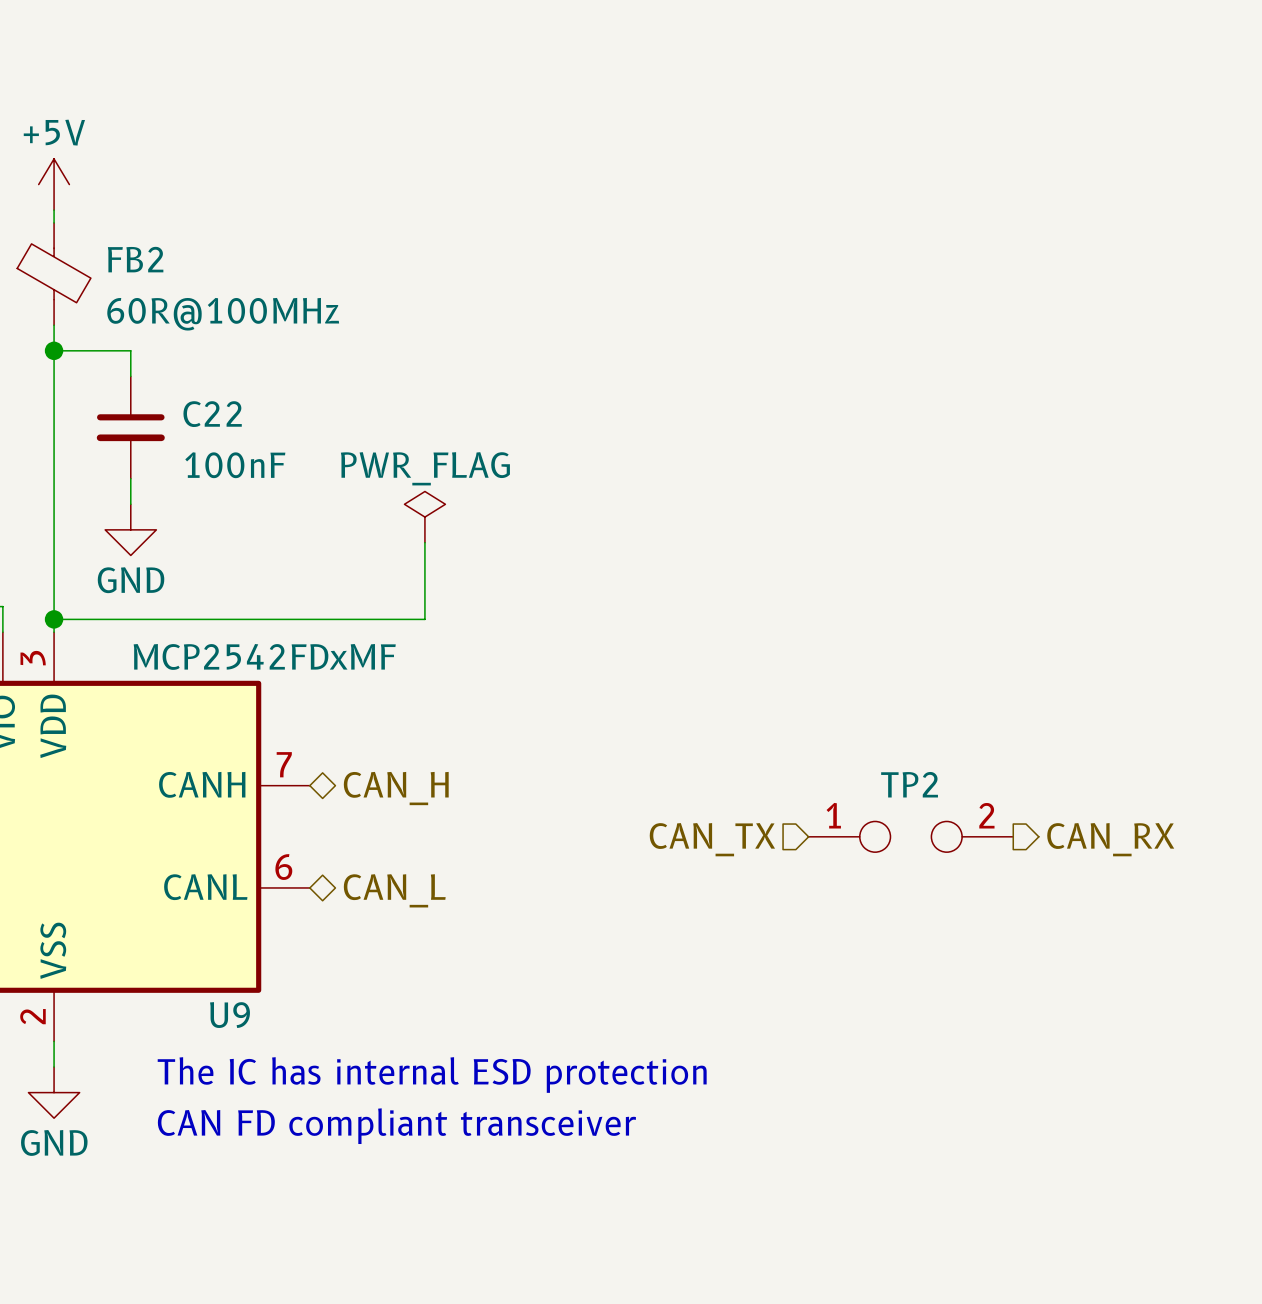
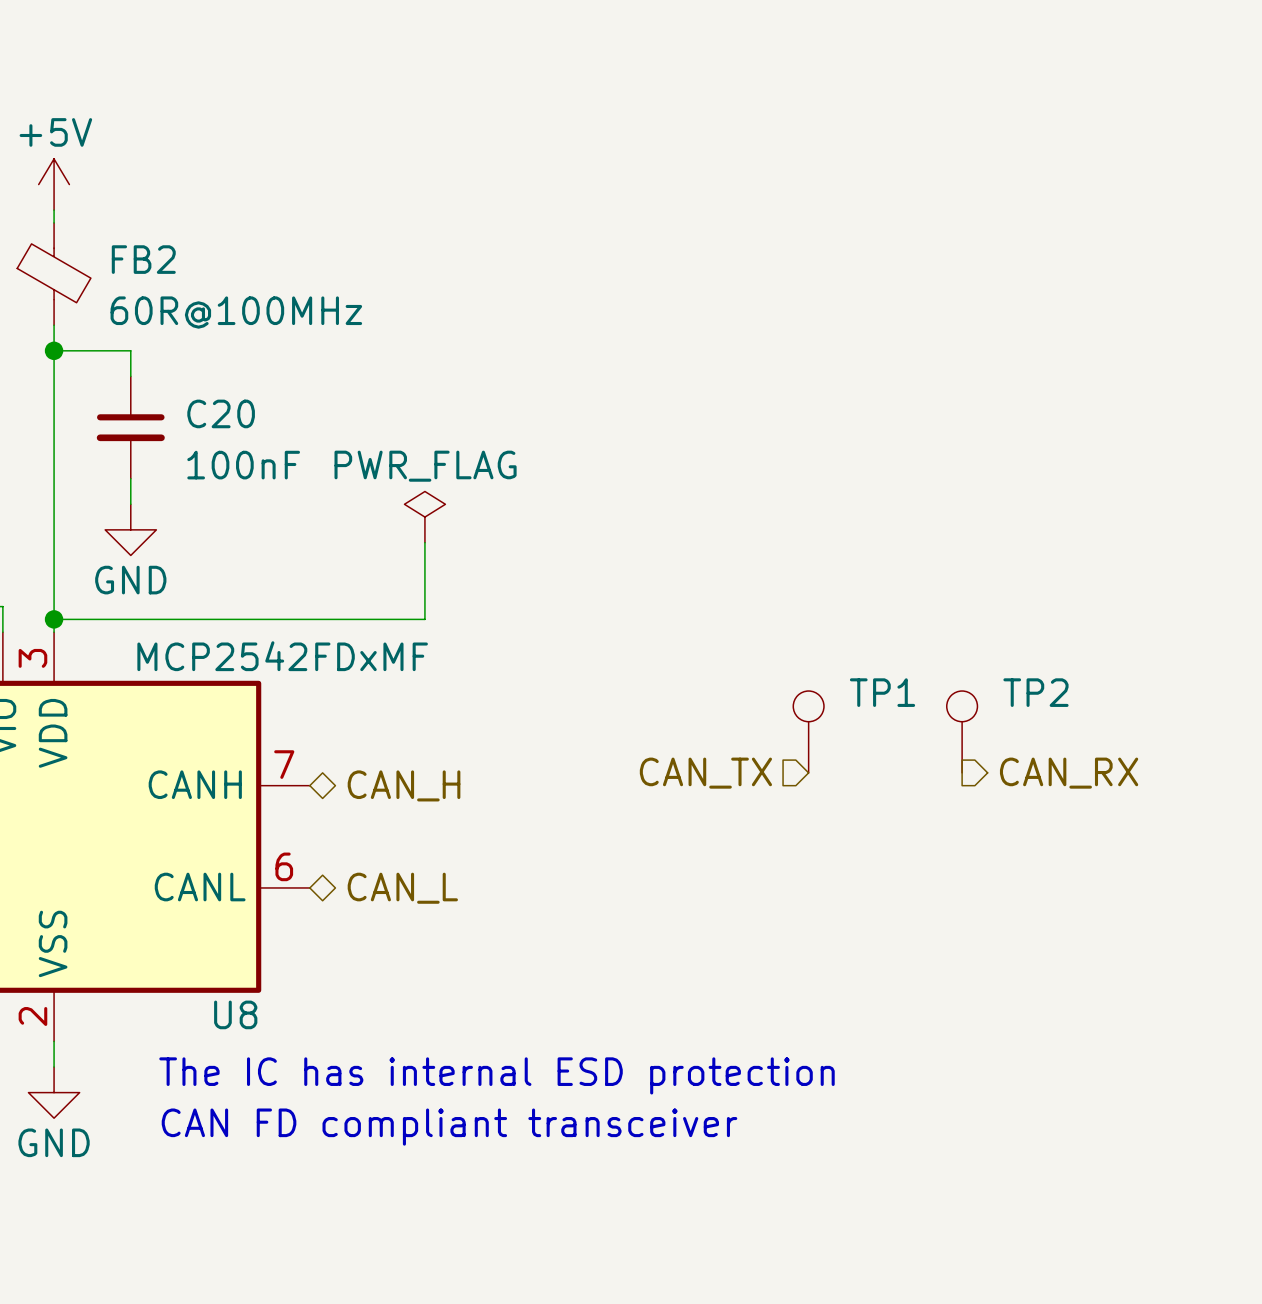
C22 name: C22 (212, 414) -> C20 (221, 413)
TP1: none -> (808, 731)
TP2 name position: TP2 (909, 784) -> TP2 (1035, 692)
TP2 symbol: [808, 821, 1014, 853] -> [946, 691, 978, 773]
hierarchical label position: CAN_TX (712, 839) -> CAN_TX (705, 773)
hierarchical label position: CAN_RX (1110, 839) -> CAN_RX (1069, 773)
U9 name: U9 (230, 1015) -> U8 (235, 1014)

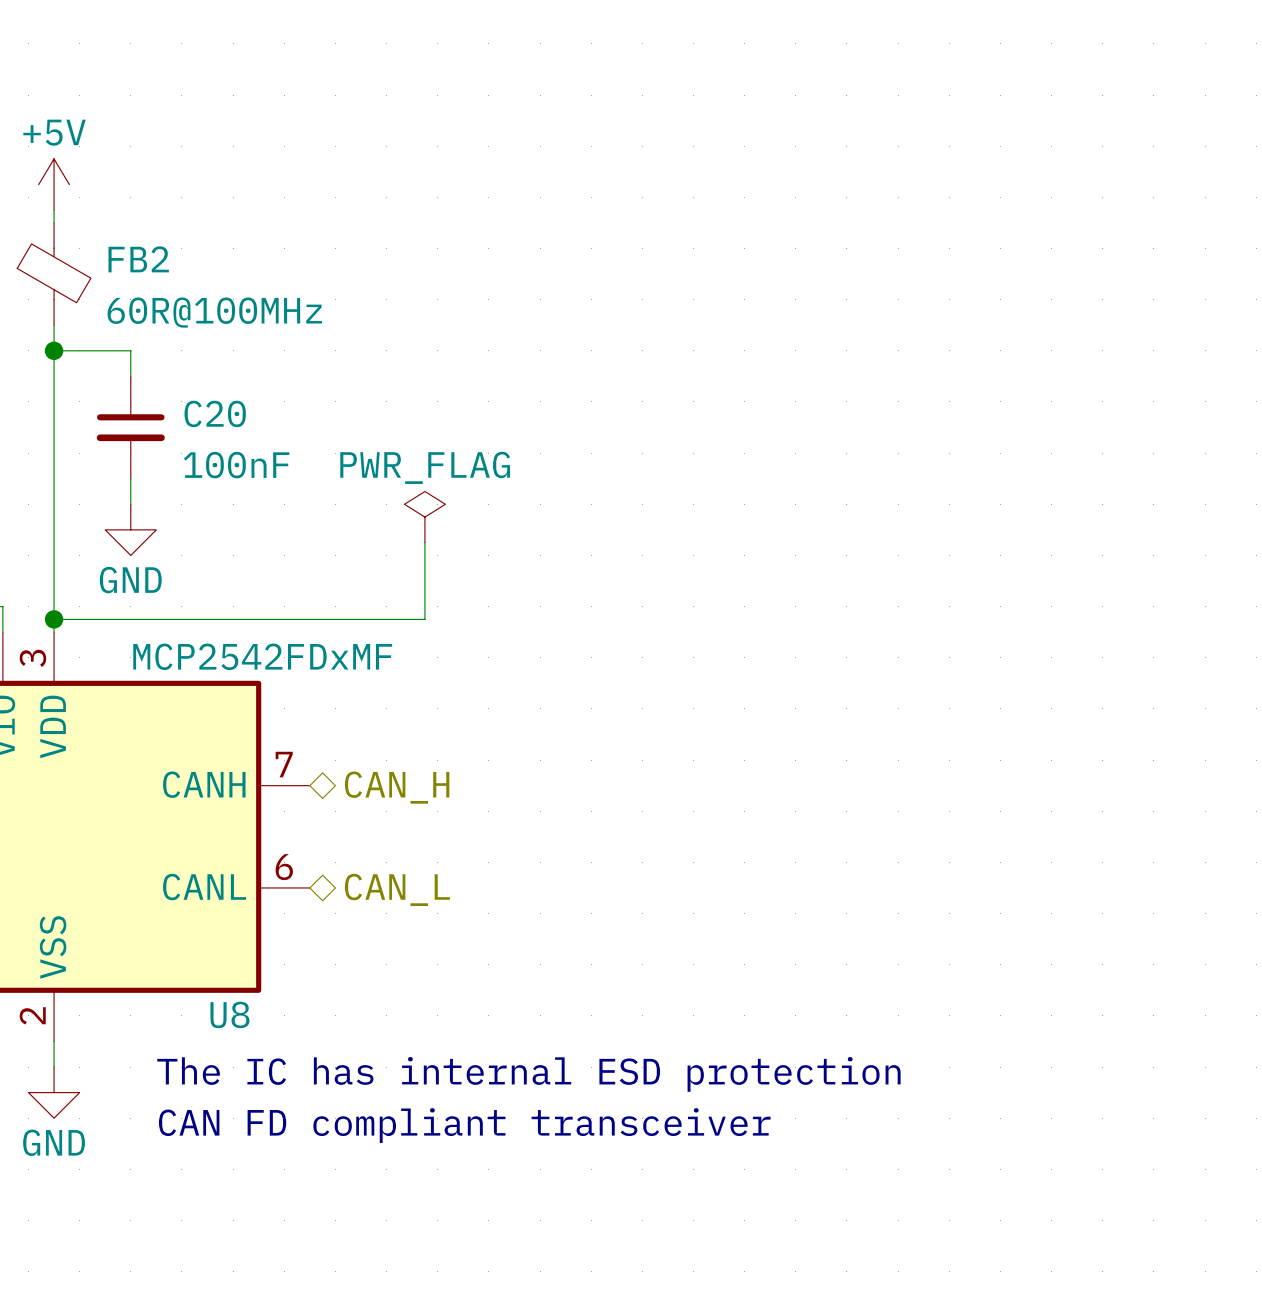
TP1: (808, 731) -> none
TP2: (962, 731) -> none
hierarchical label: CAN_TX (705, 773) -> none
hierarchical label: CAN_RX (1069, 773) -> none

